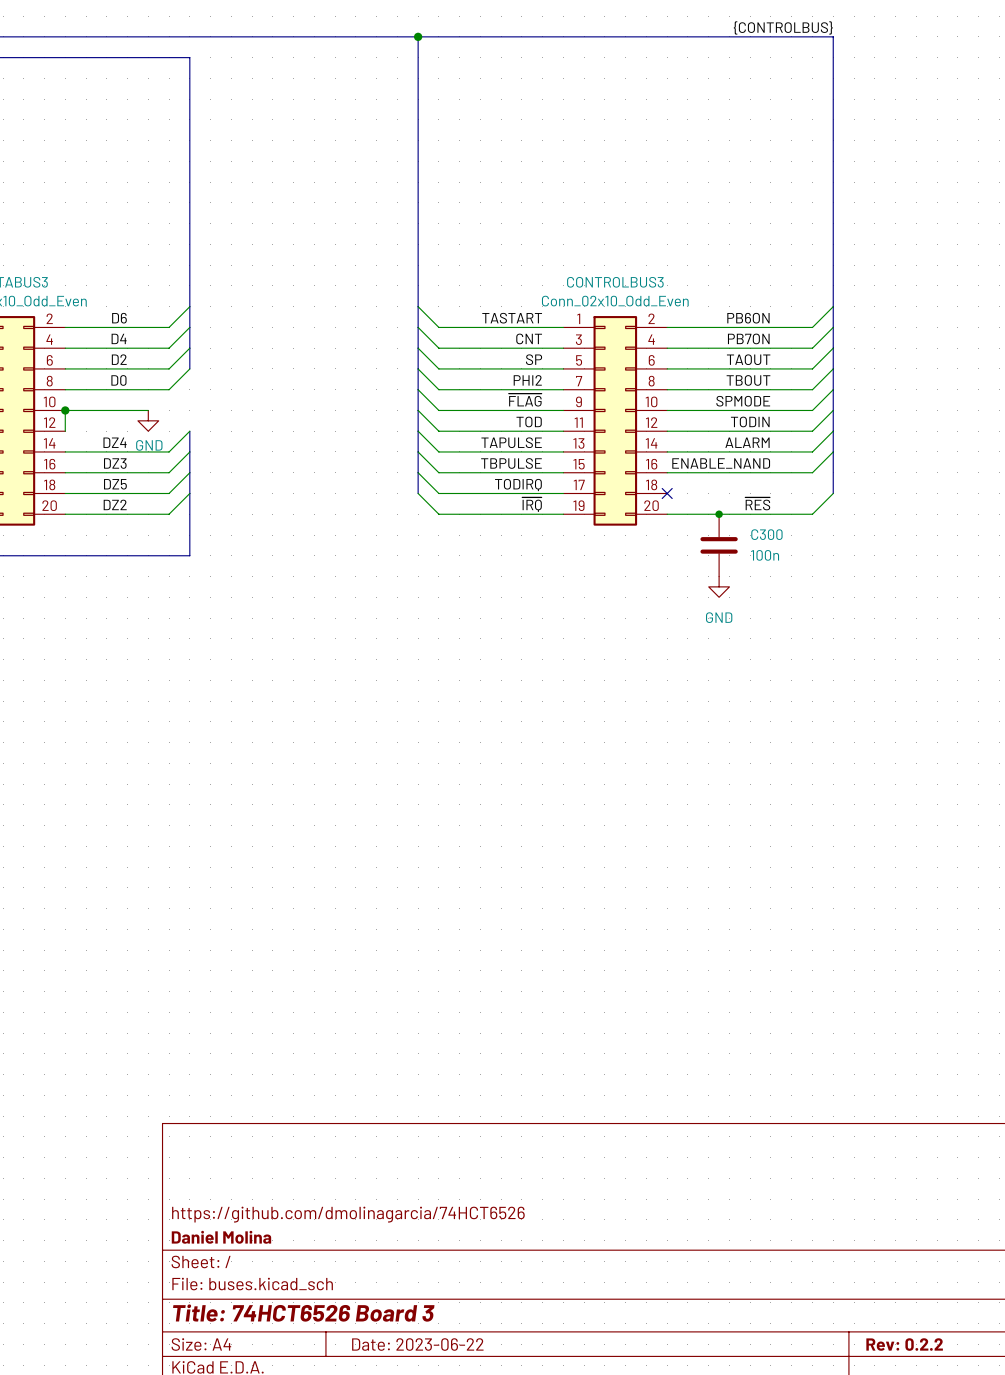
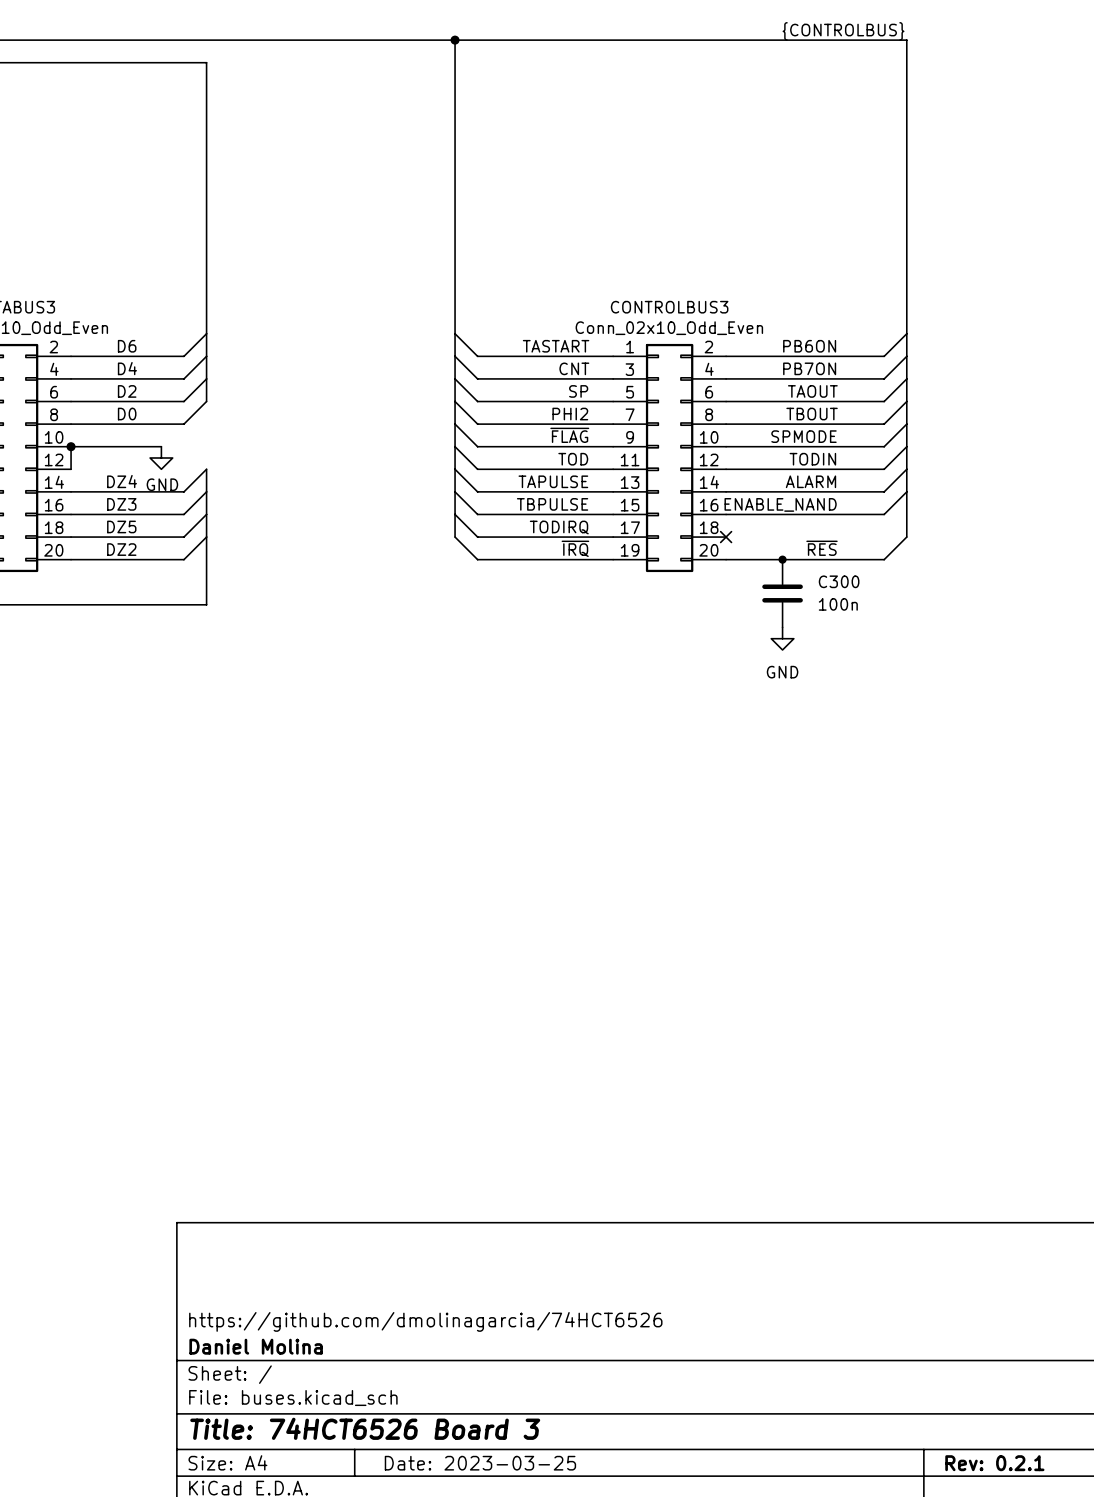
title block: Date: 2023-06-22 (417, 1344) -> Date: 2023-03-25 (480, 1463)
title block: Rev: 0.2.2 (904, 1344) -> Rev: 0.2.1 (994, 1463)

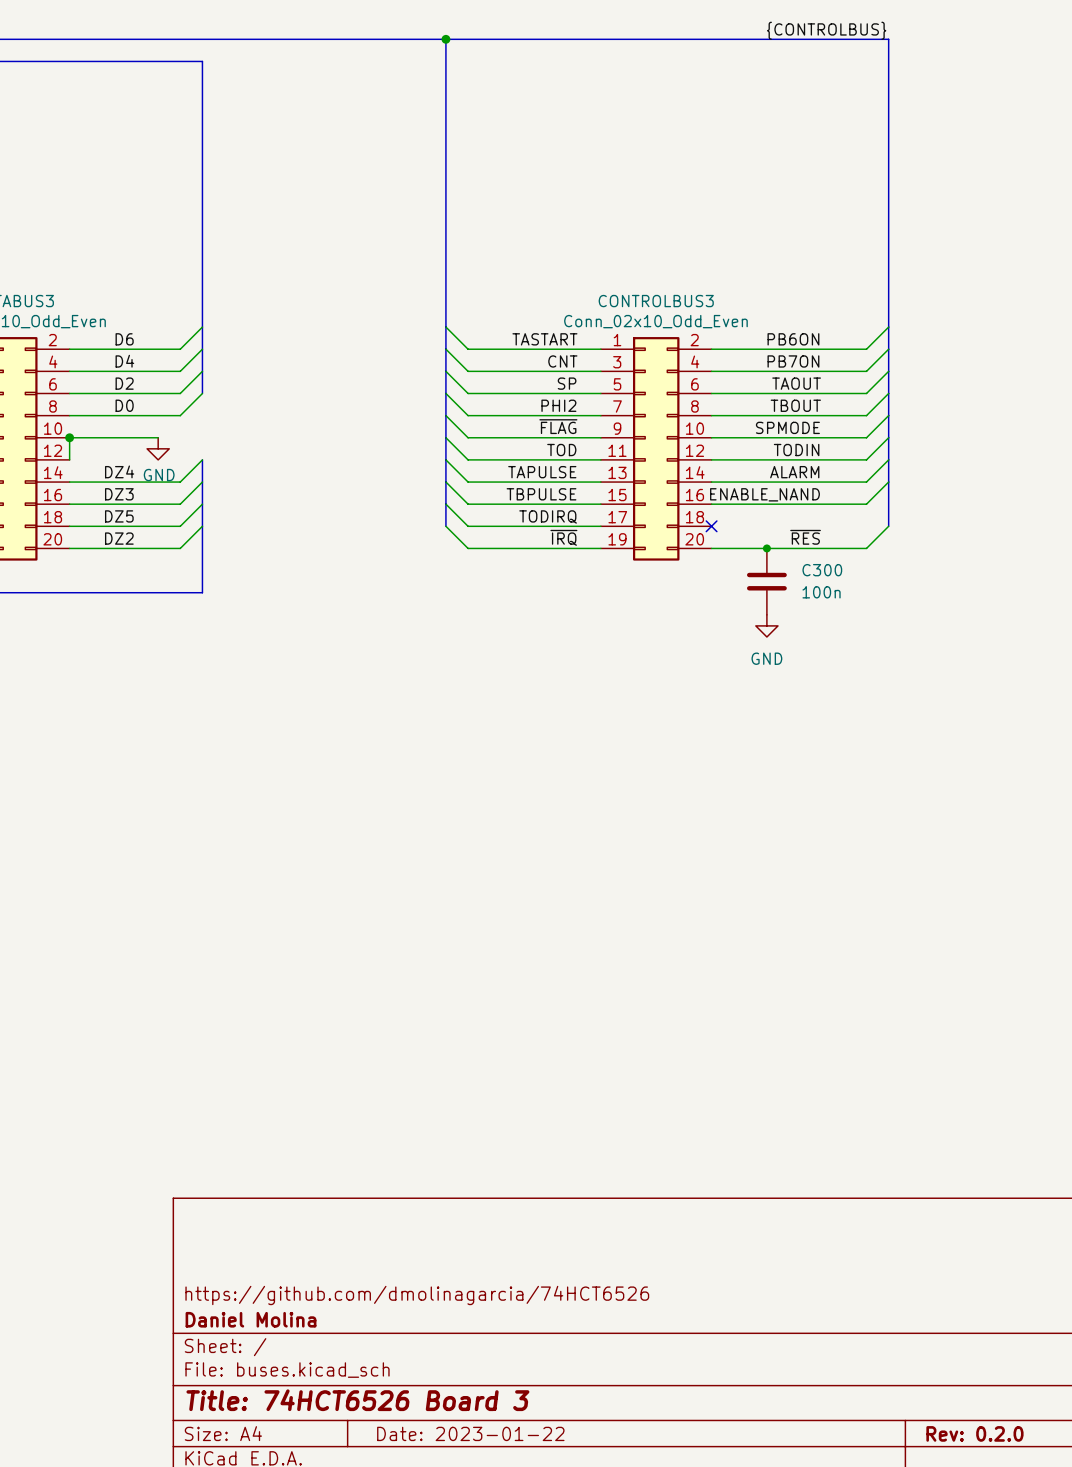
title block: Date: 2023-03-25 (480, 1463) -> Date: 2023-01-22 (470, 1433)
title block: Rev: 0.2.1 (994, 1463) -> Rev: 0.2.0 (974, 1433)

